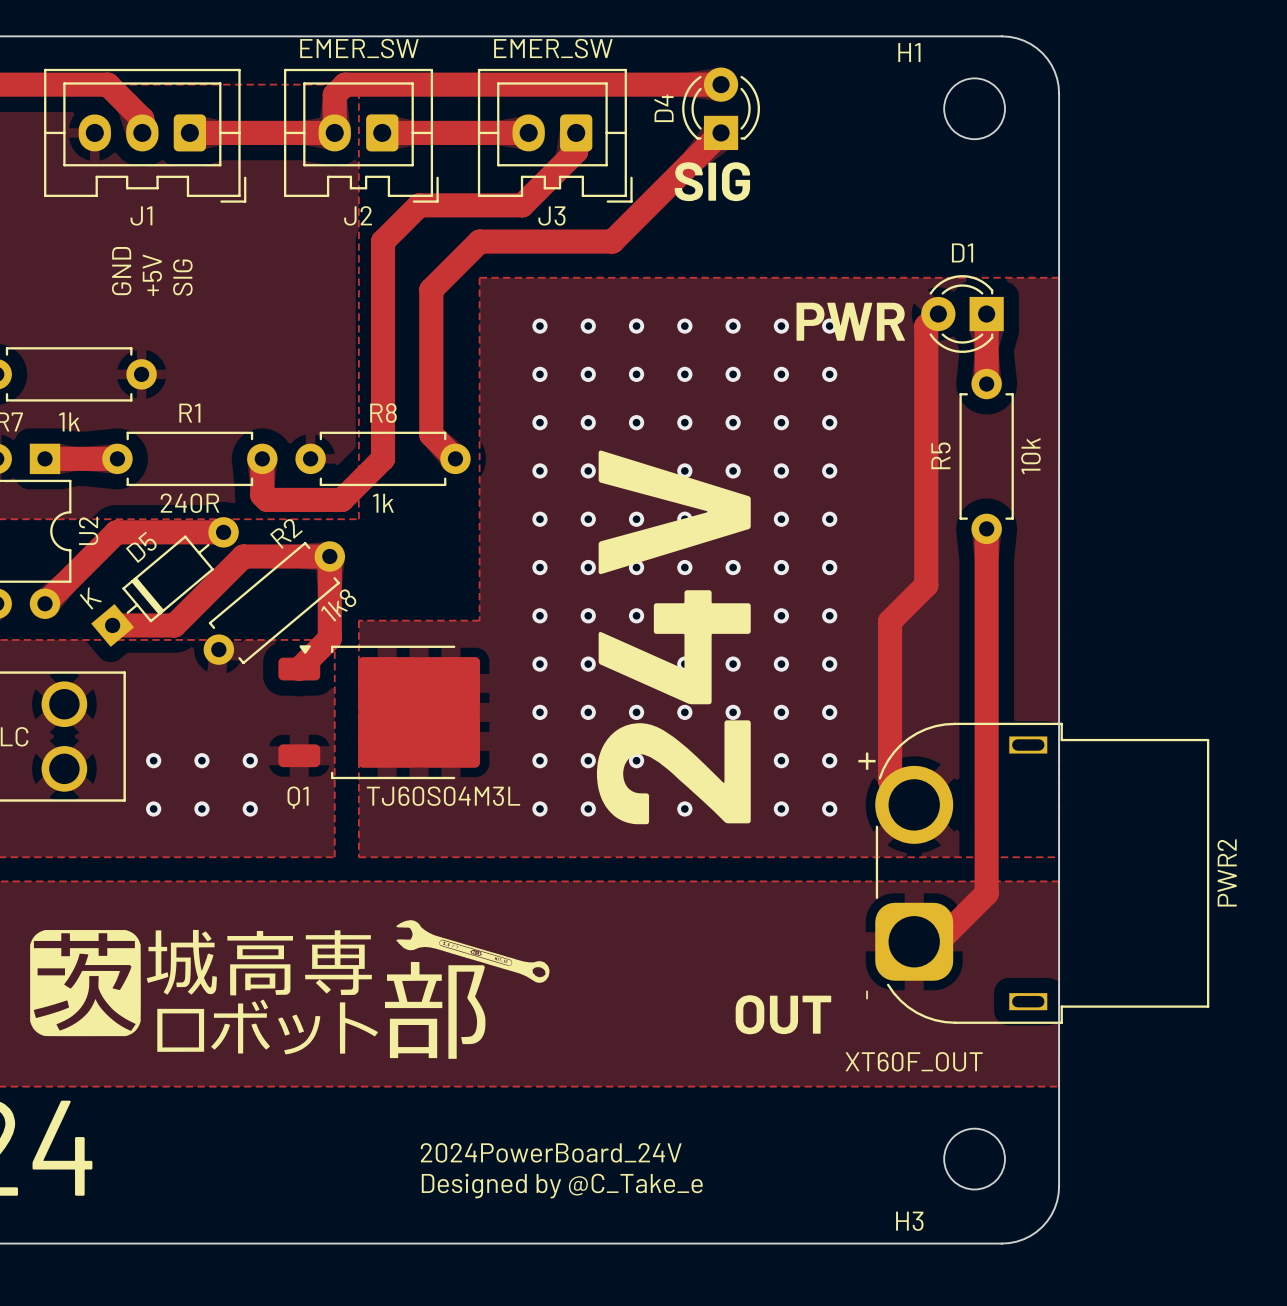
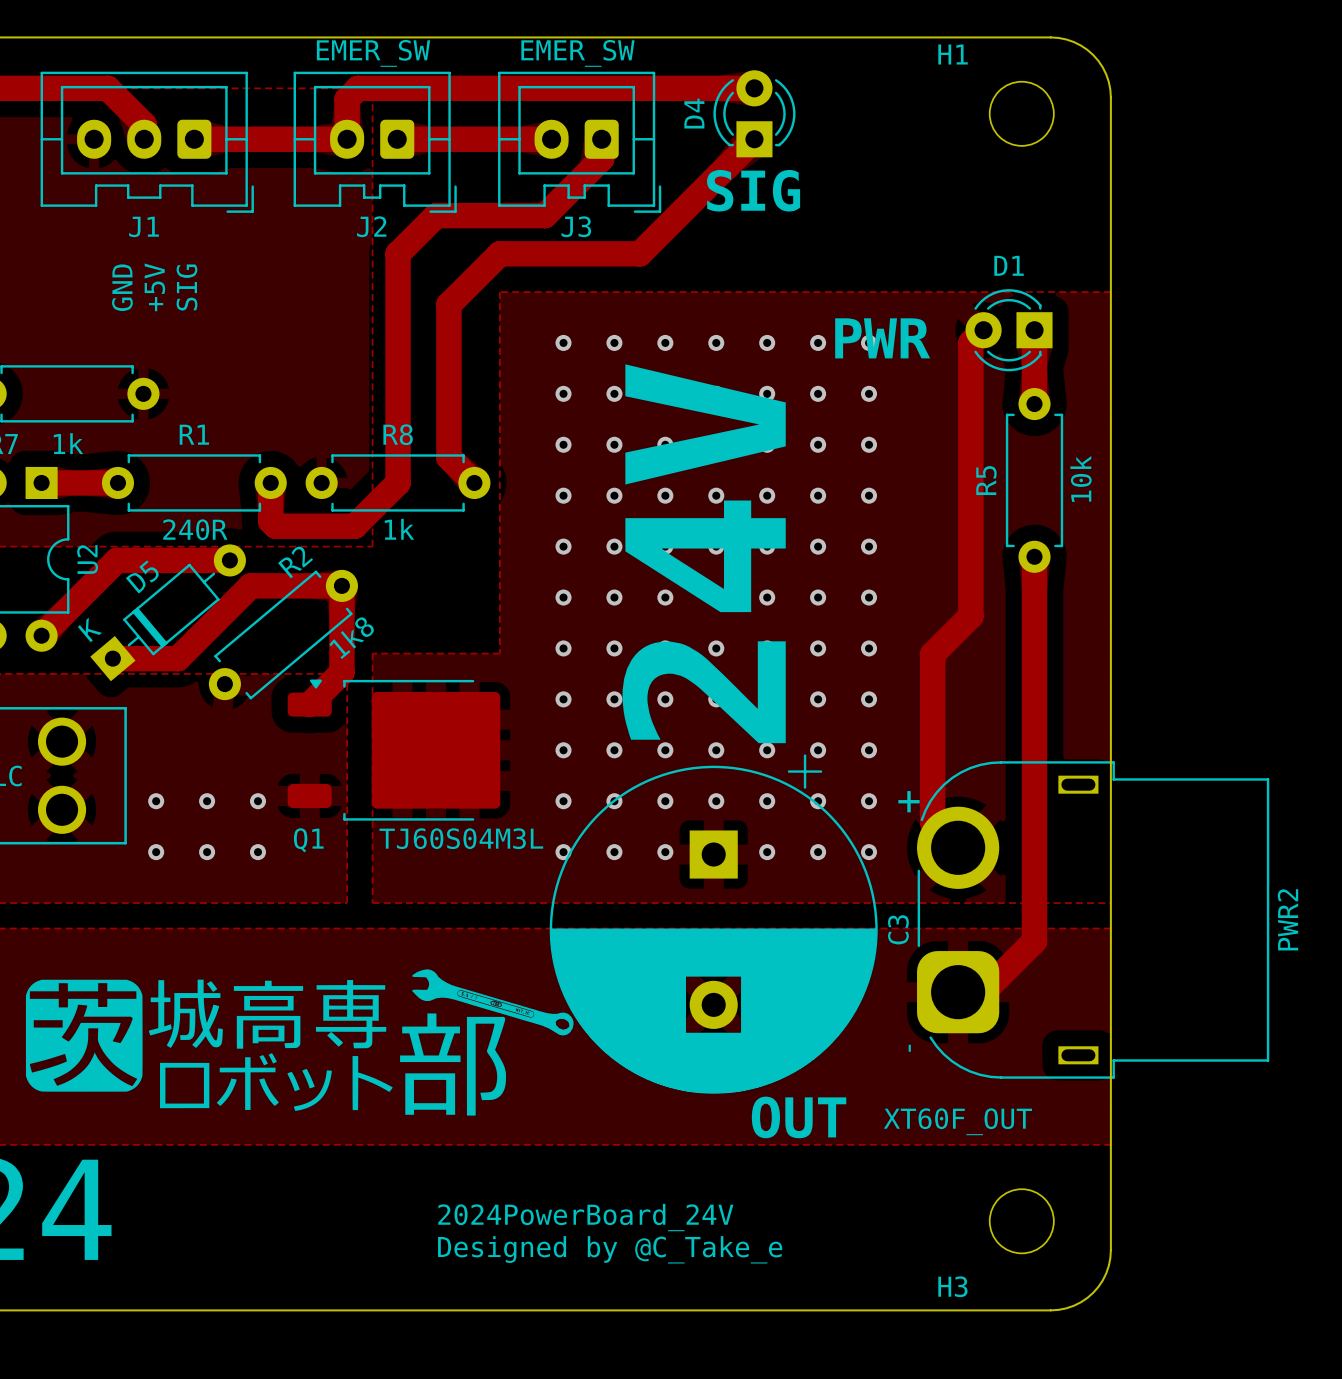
text position: 24V (673, 637) -> 24V (704, 553)
via: (684, 808) -> none
C3: none -> (713, 923)
text position: OUT (783, 1014) -> OUT (799, 1117)

